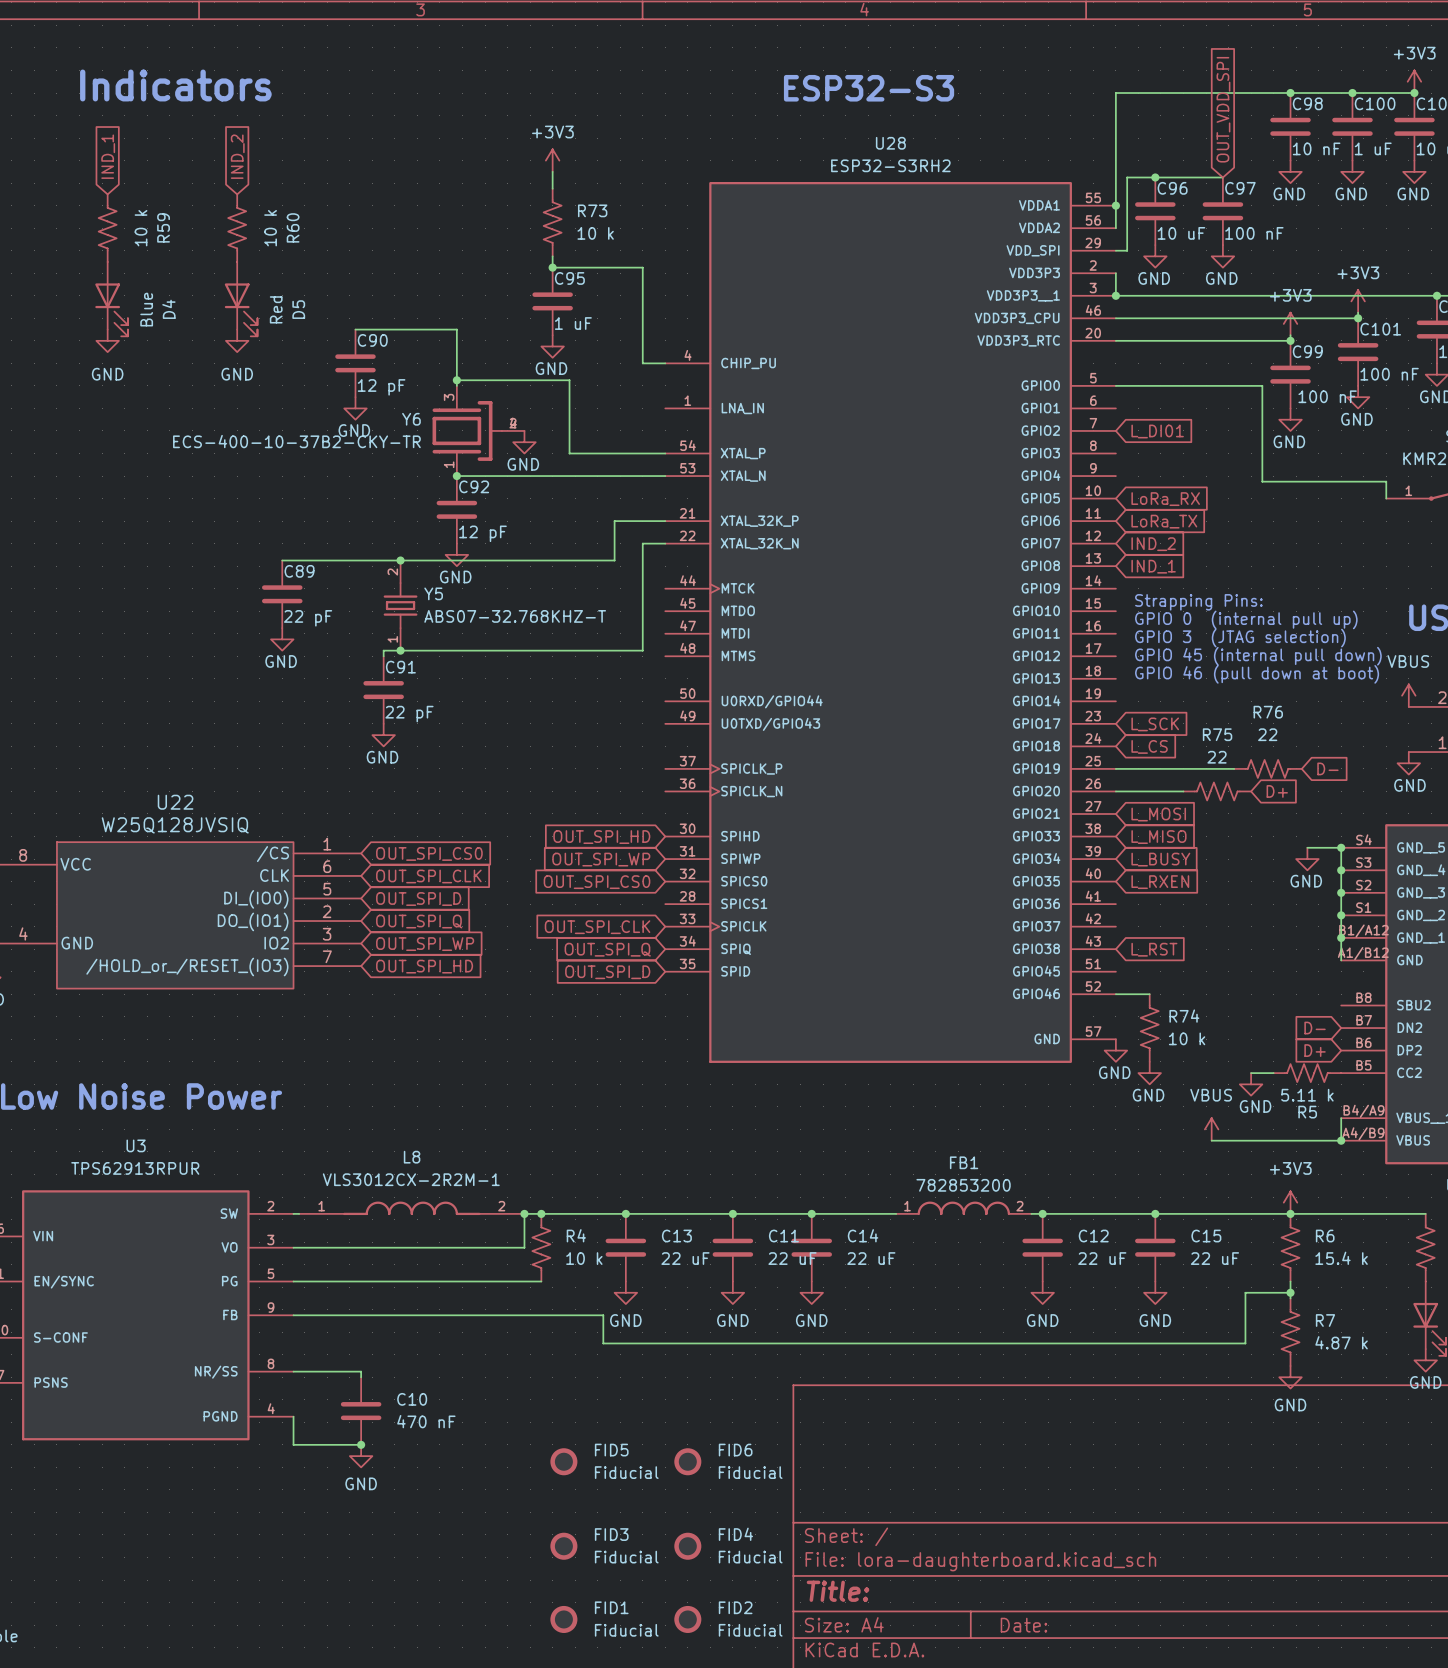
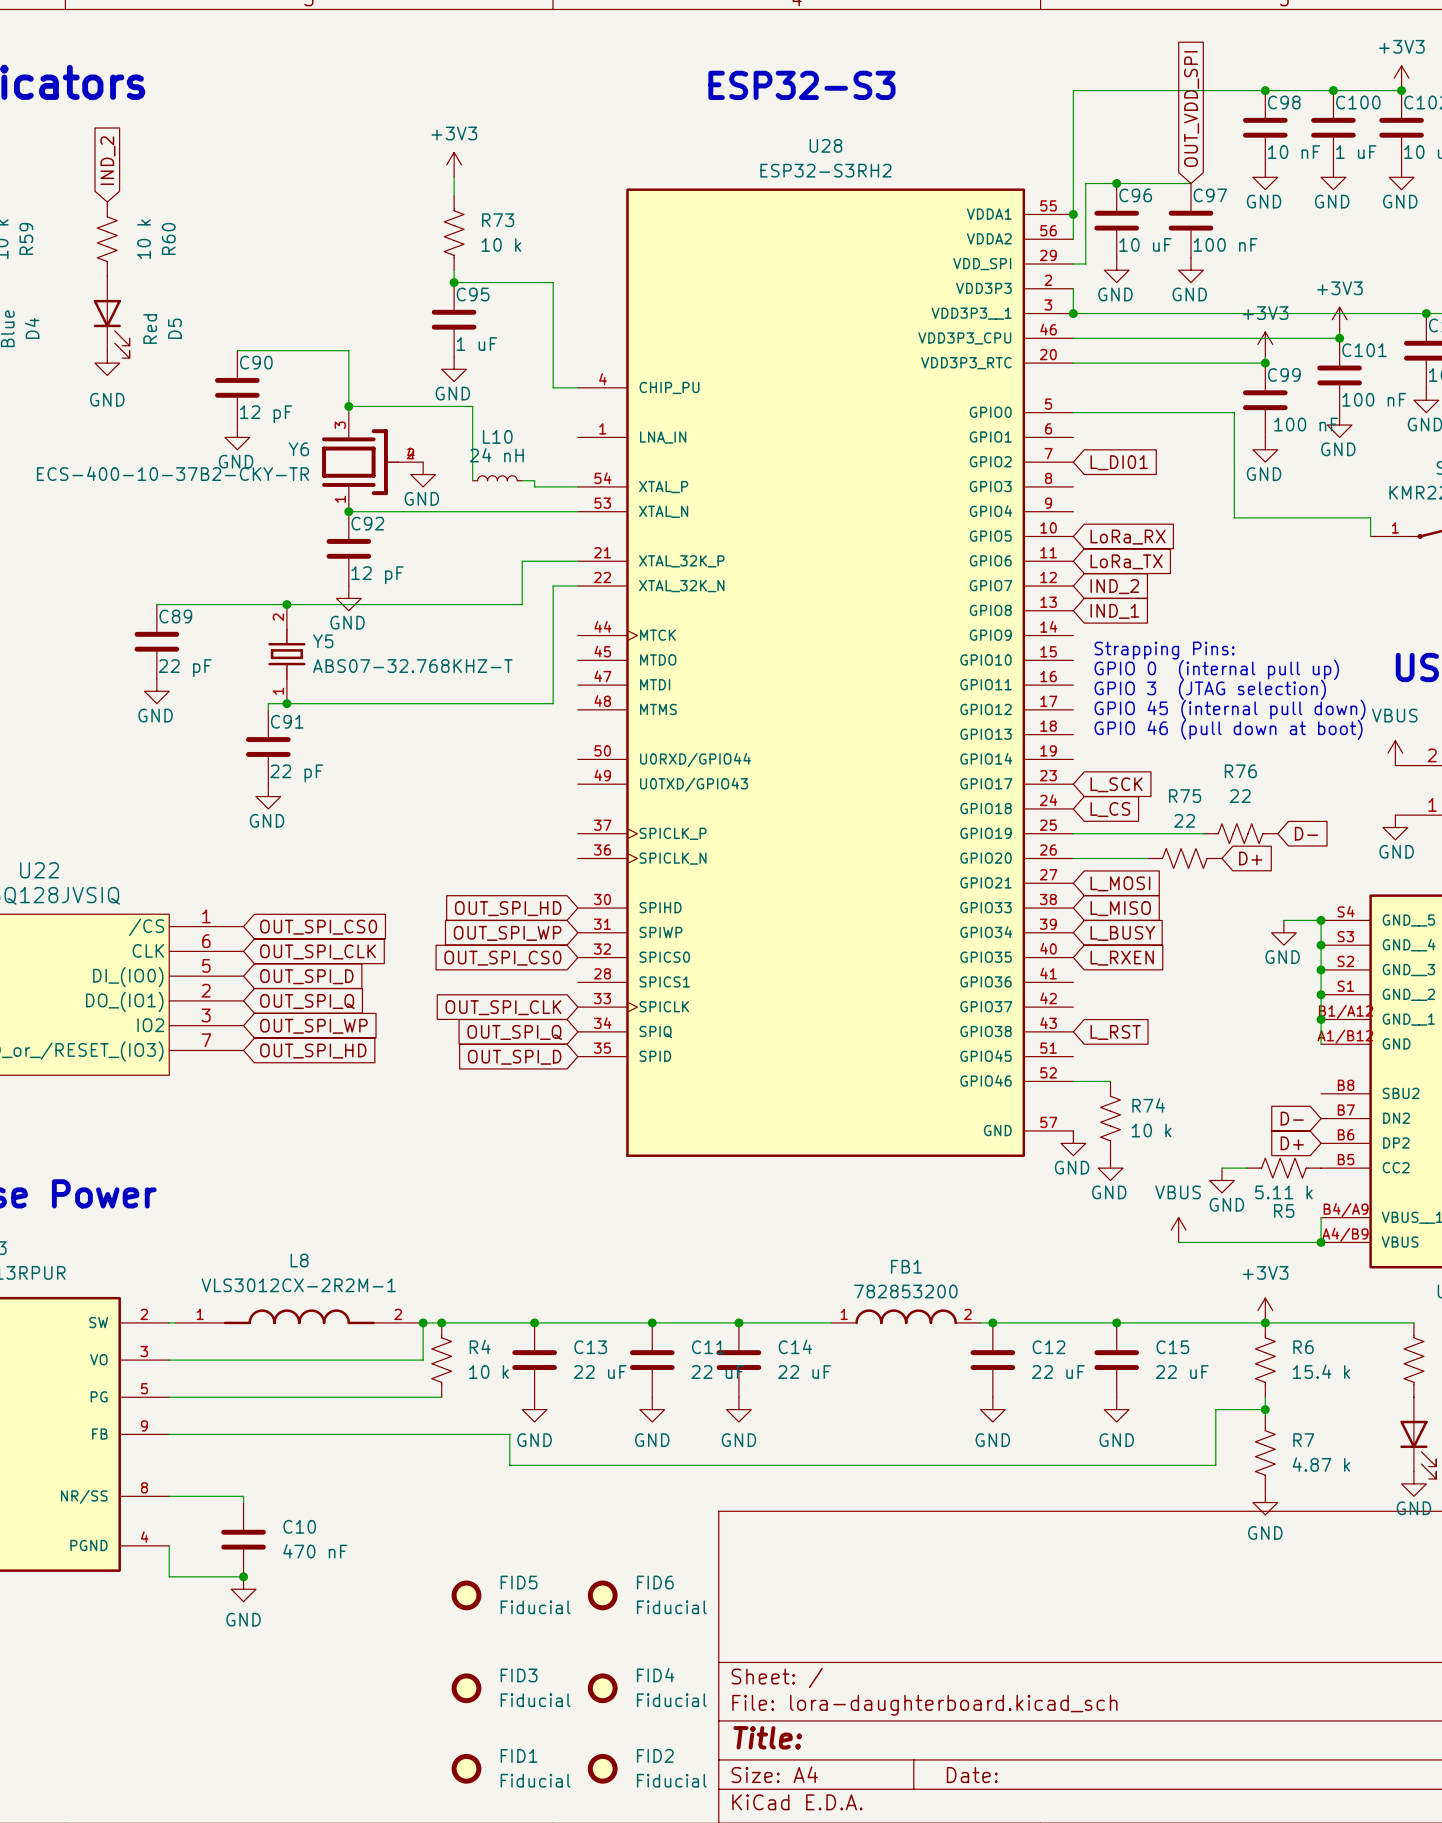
L10: none -> 24 nH (497, 478)
wire: (569, 447) (569, 453) (625, 453) -> (522, 480) (534, 480) (534, 486)

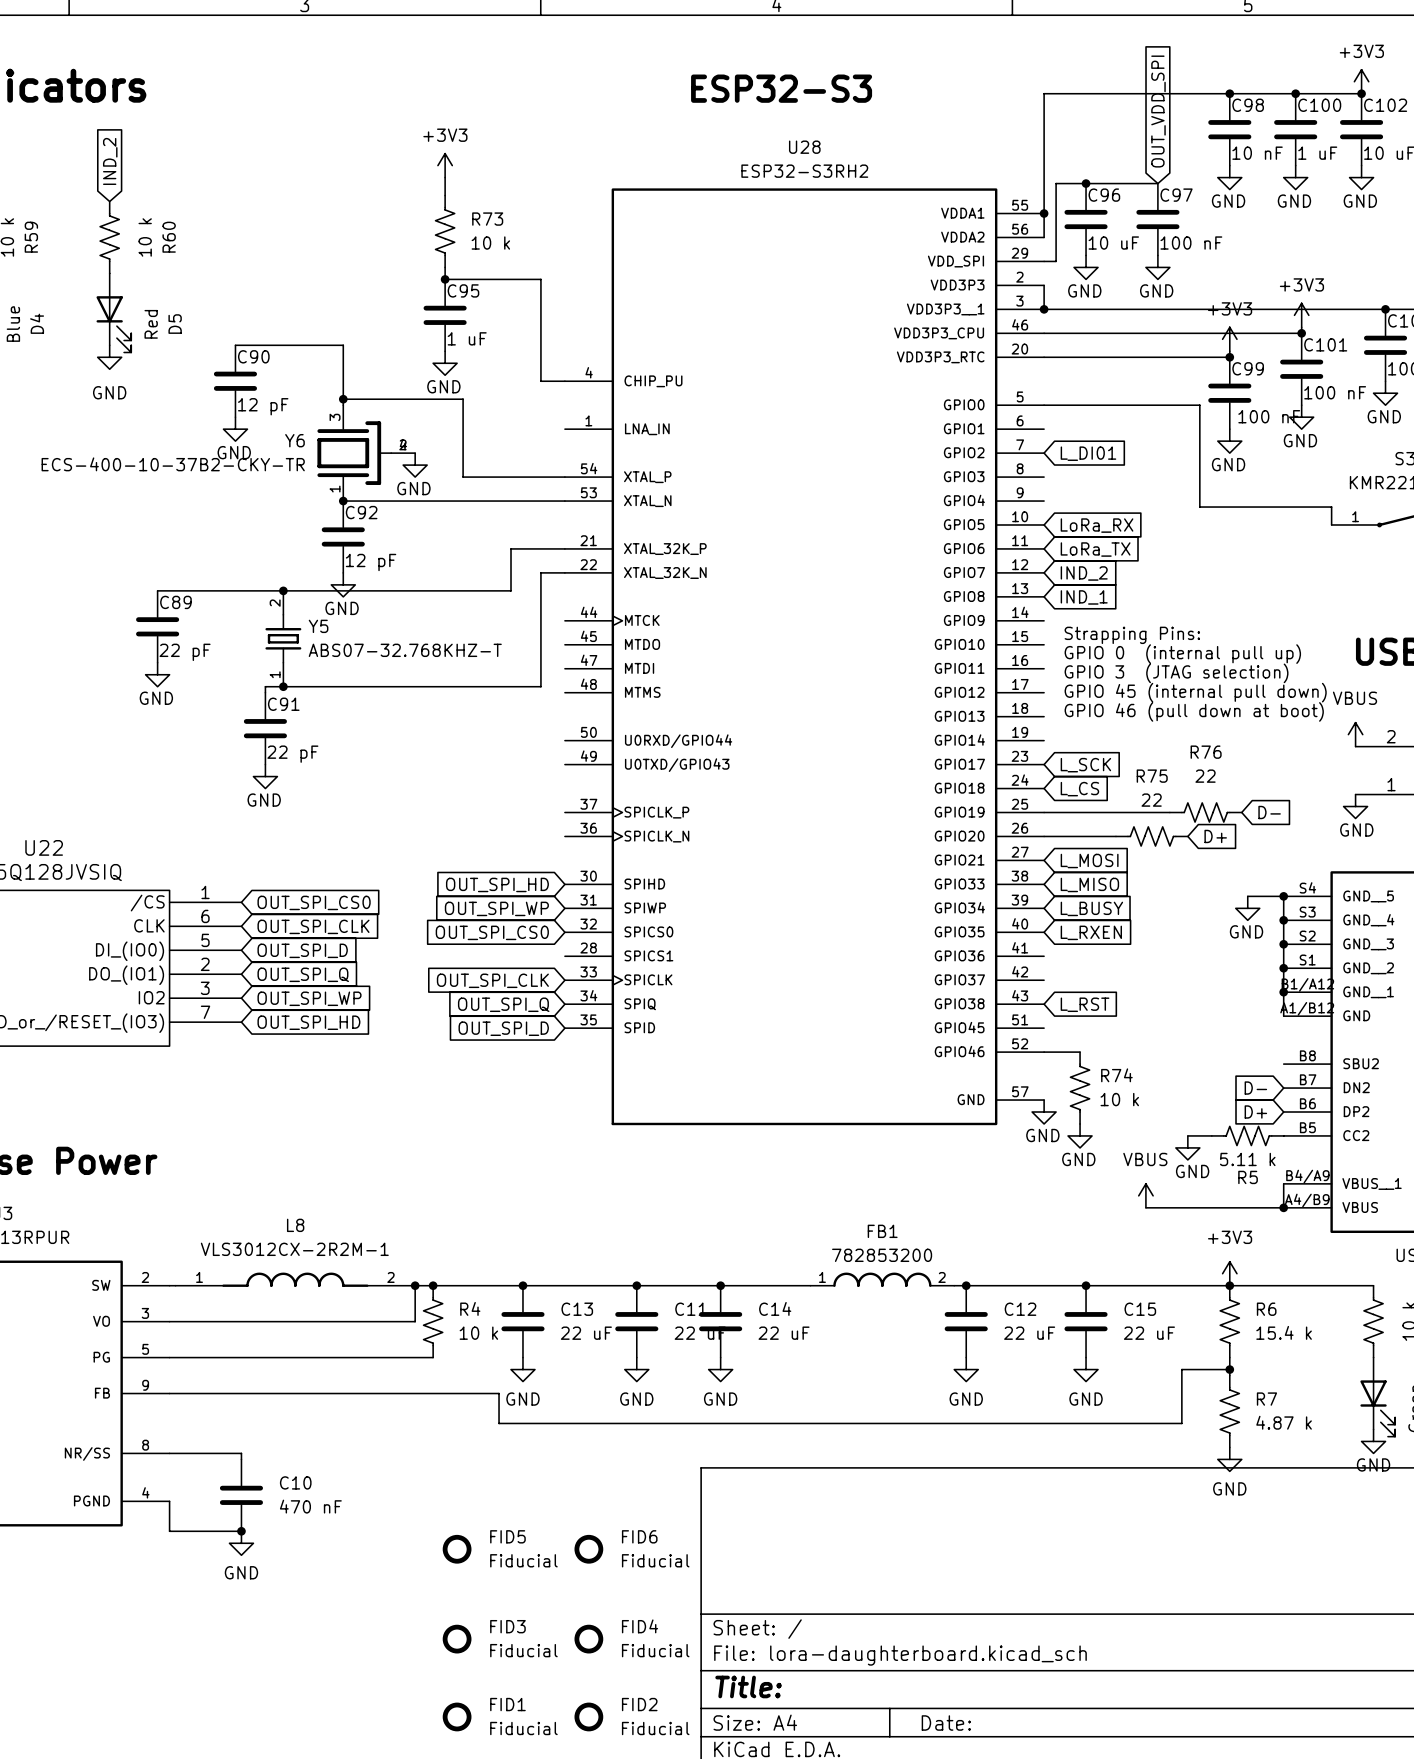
L10: 24 nH (497, 478) -> none
wire: (522, 480) (534, 480) (534, 486) -> (463, 471) (463, 477) (522, 477)

